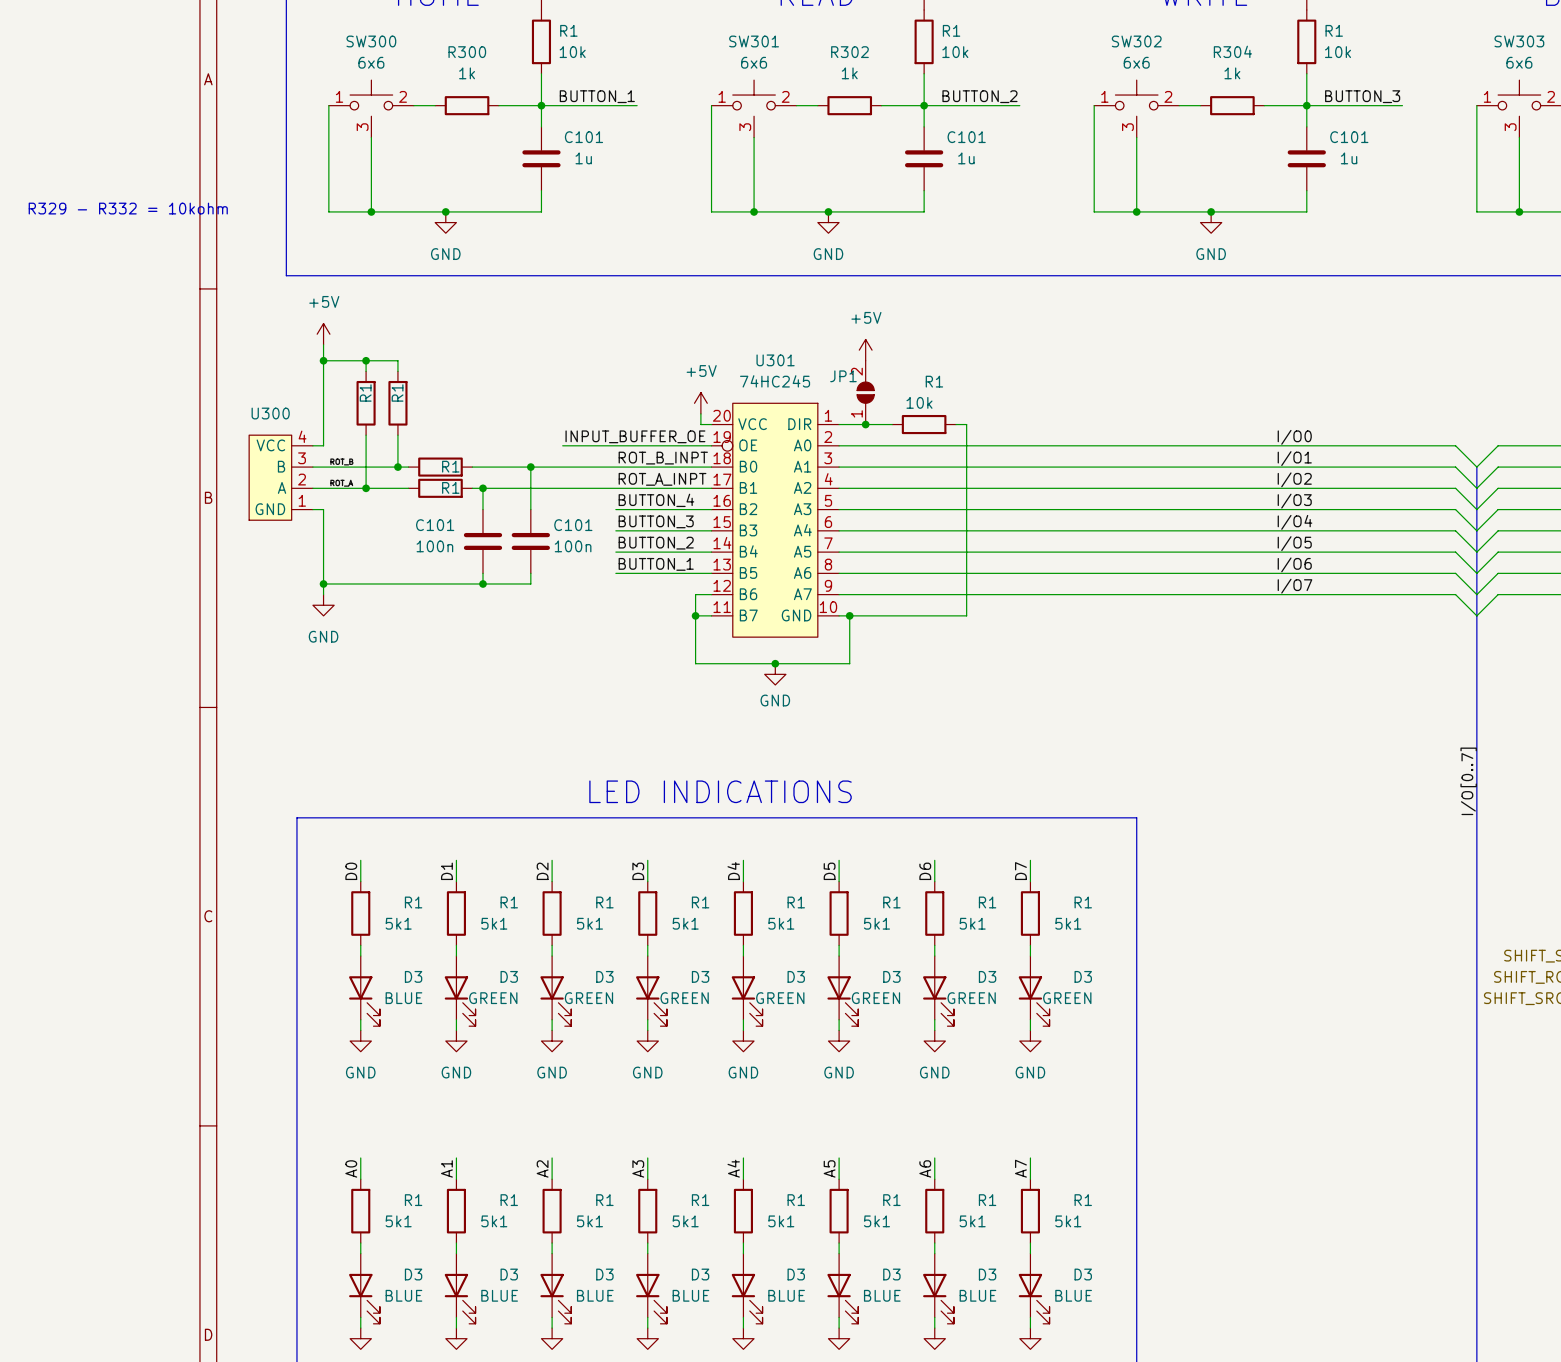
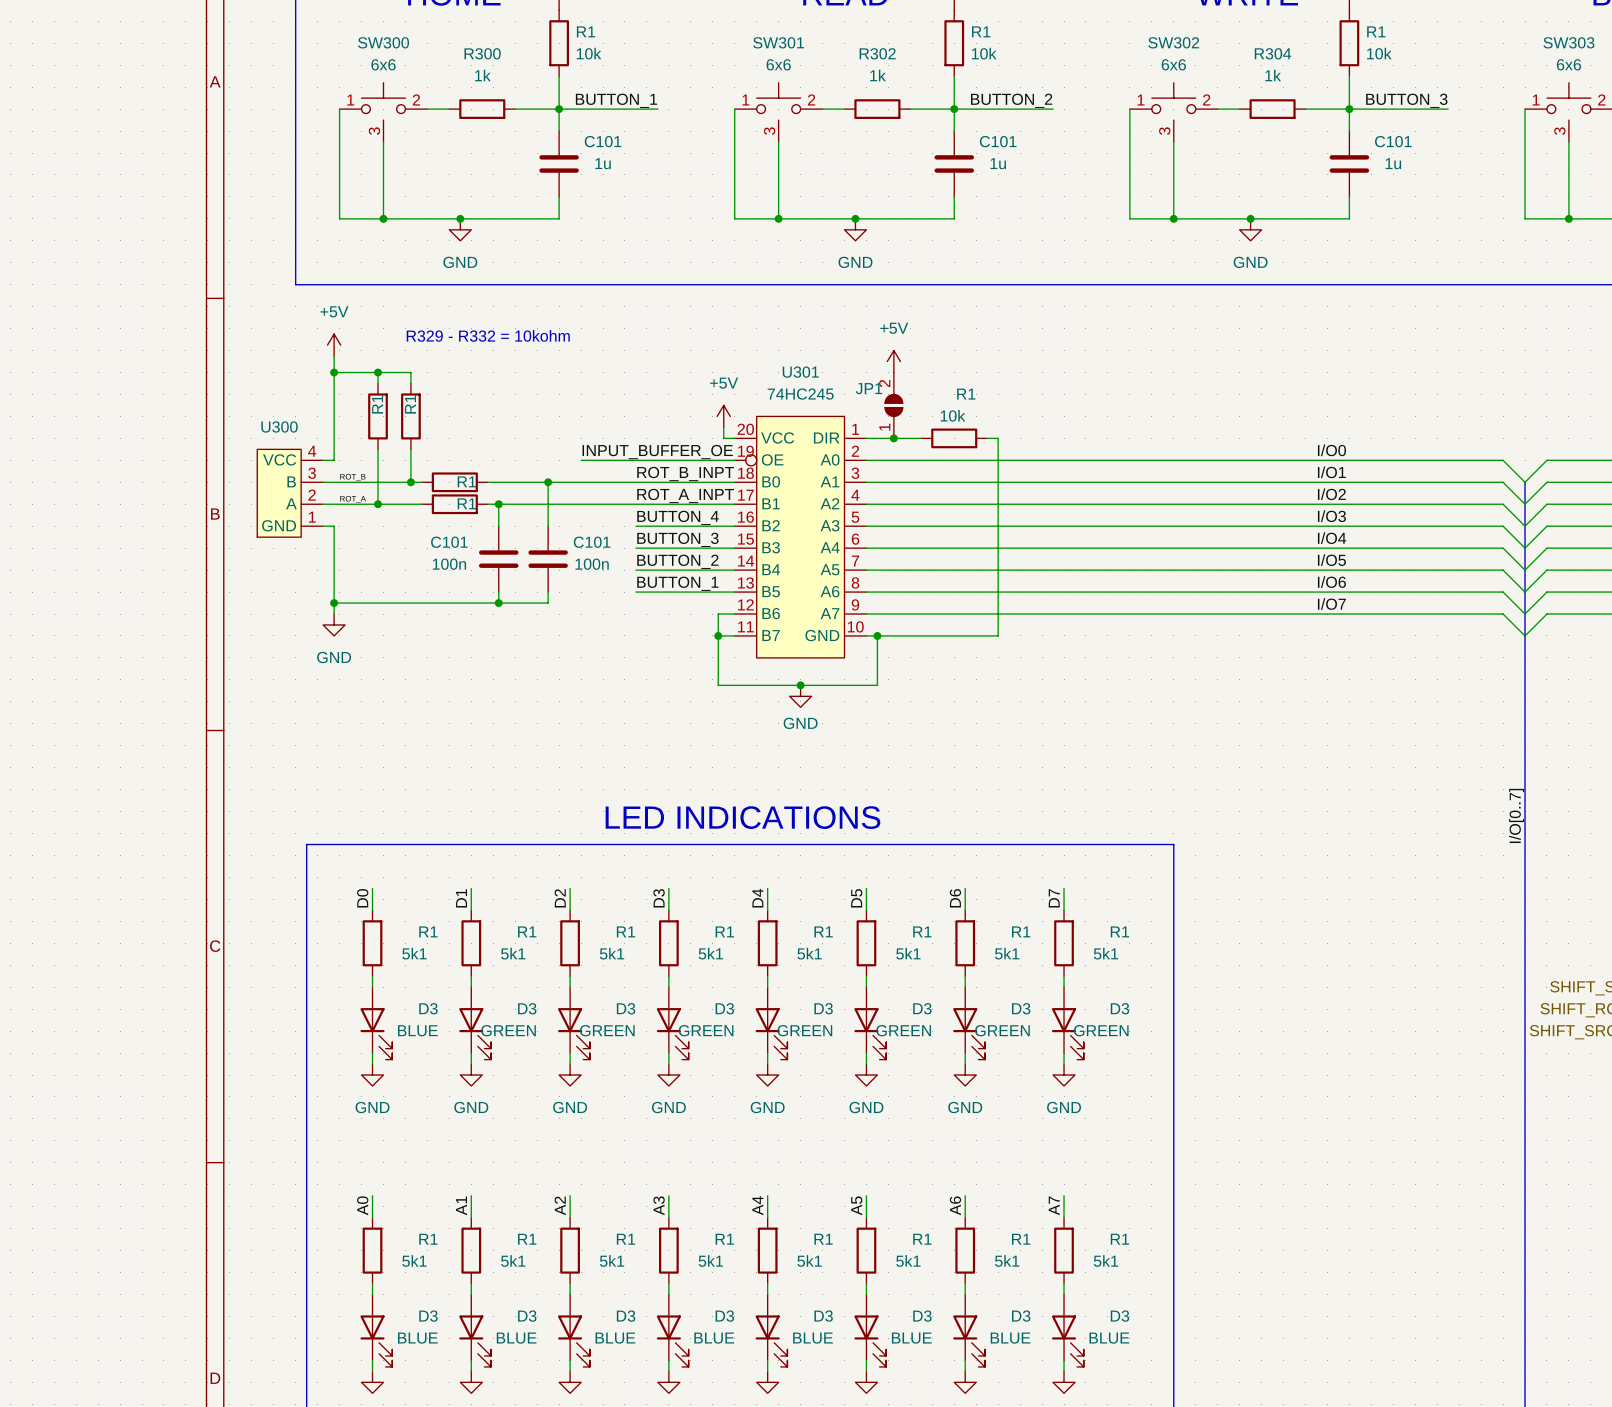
text: R329 - R332 = 10kohm (128, 208) -> none
text: none -> R329 - R332 = 10kohm (488, 335)

